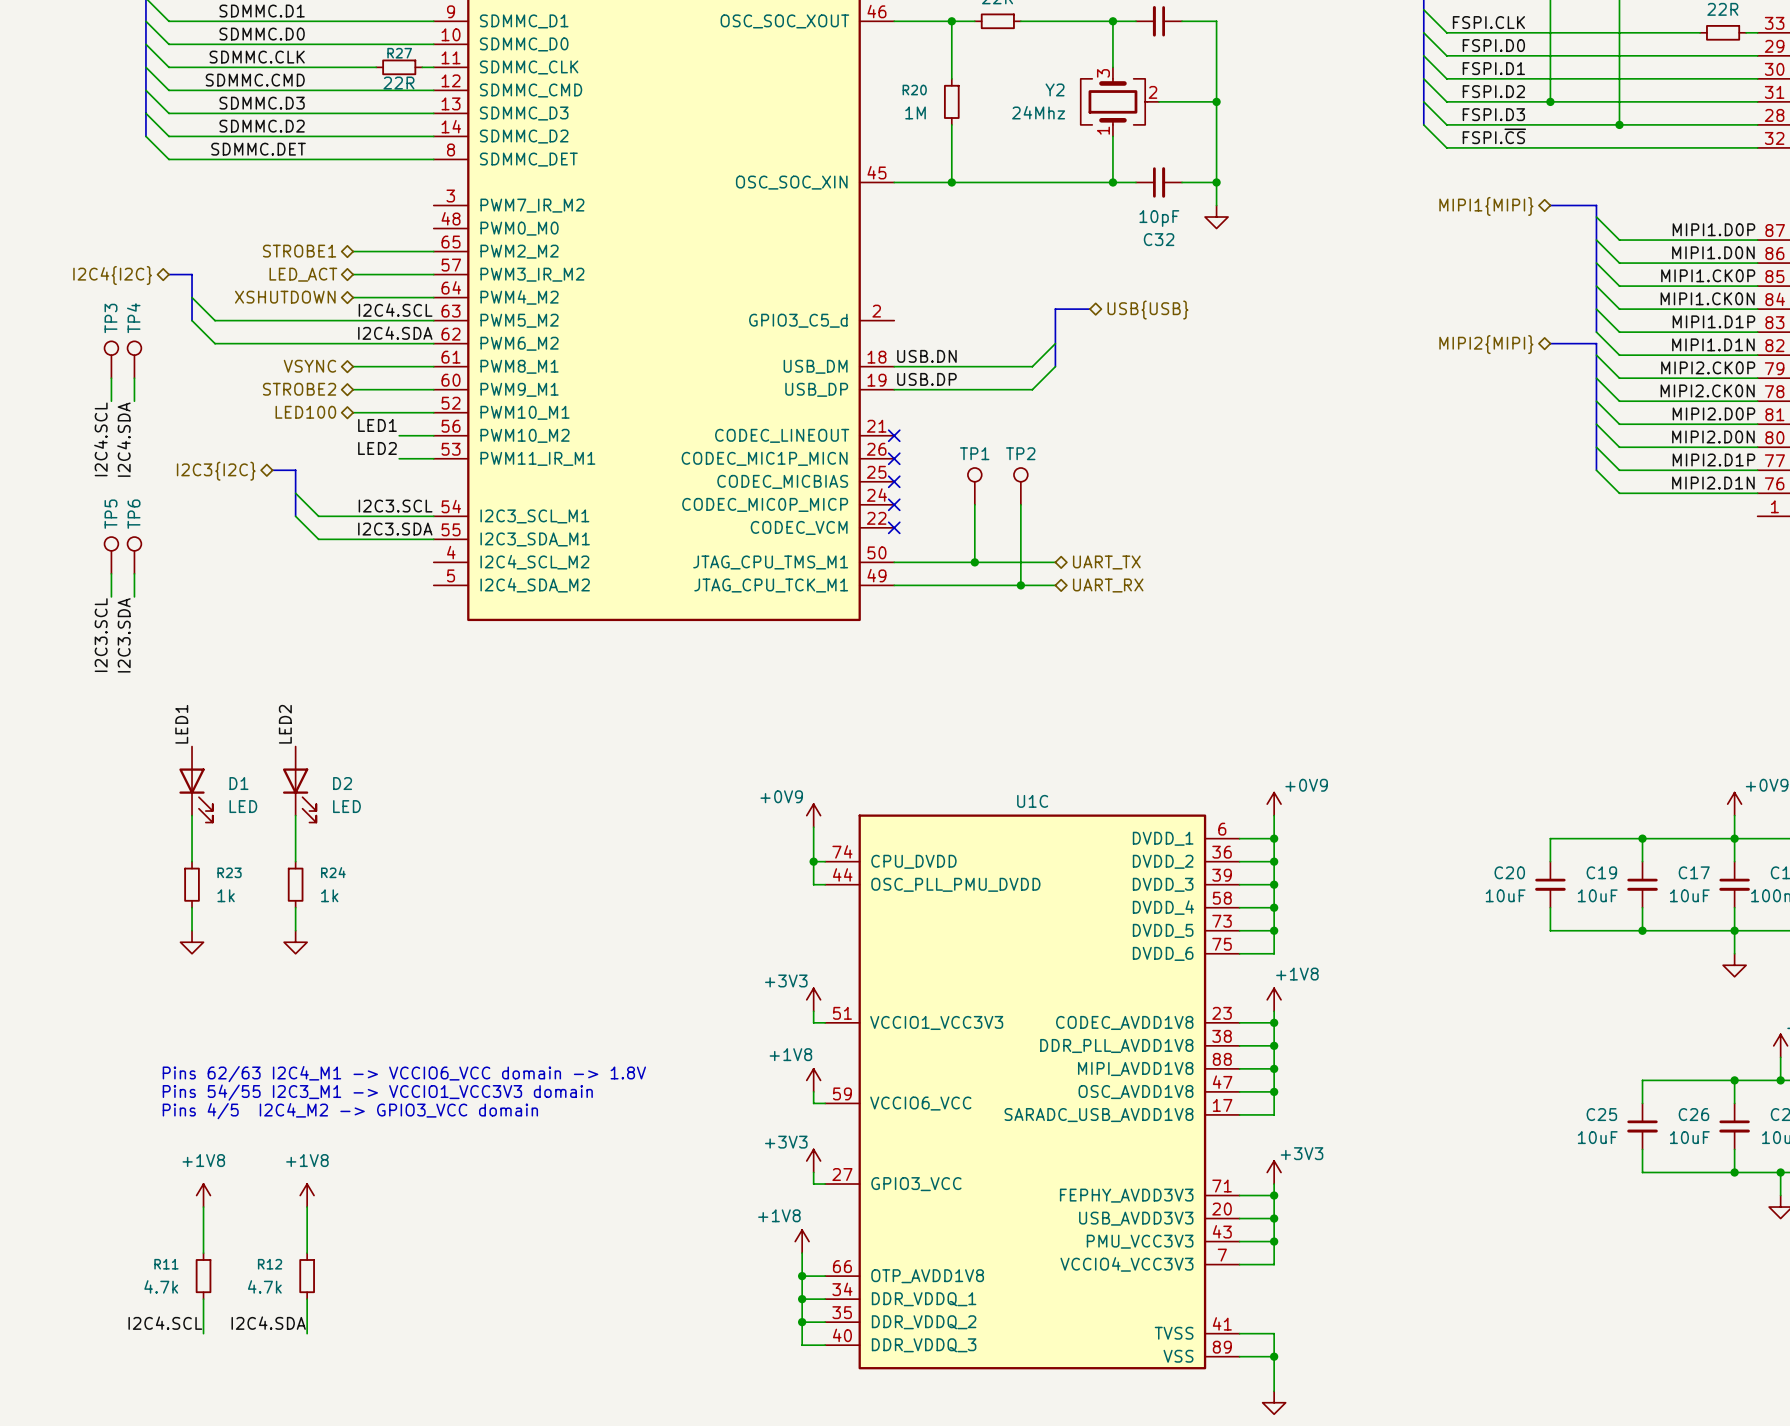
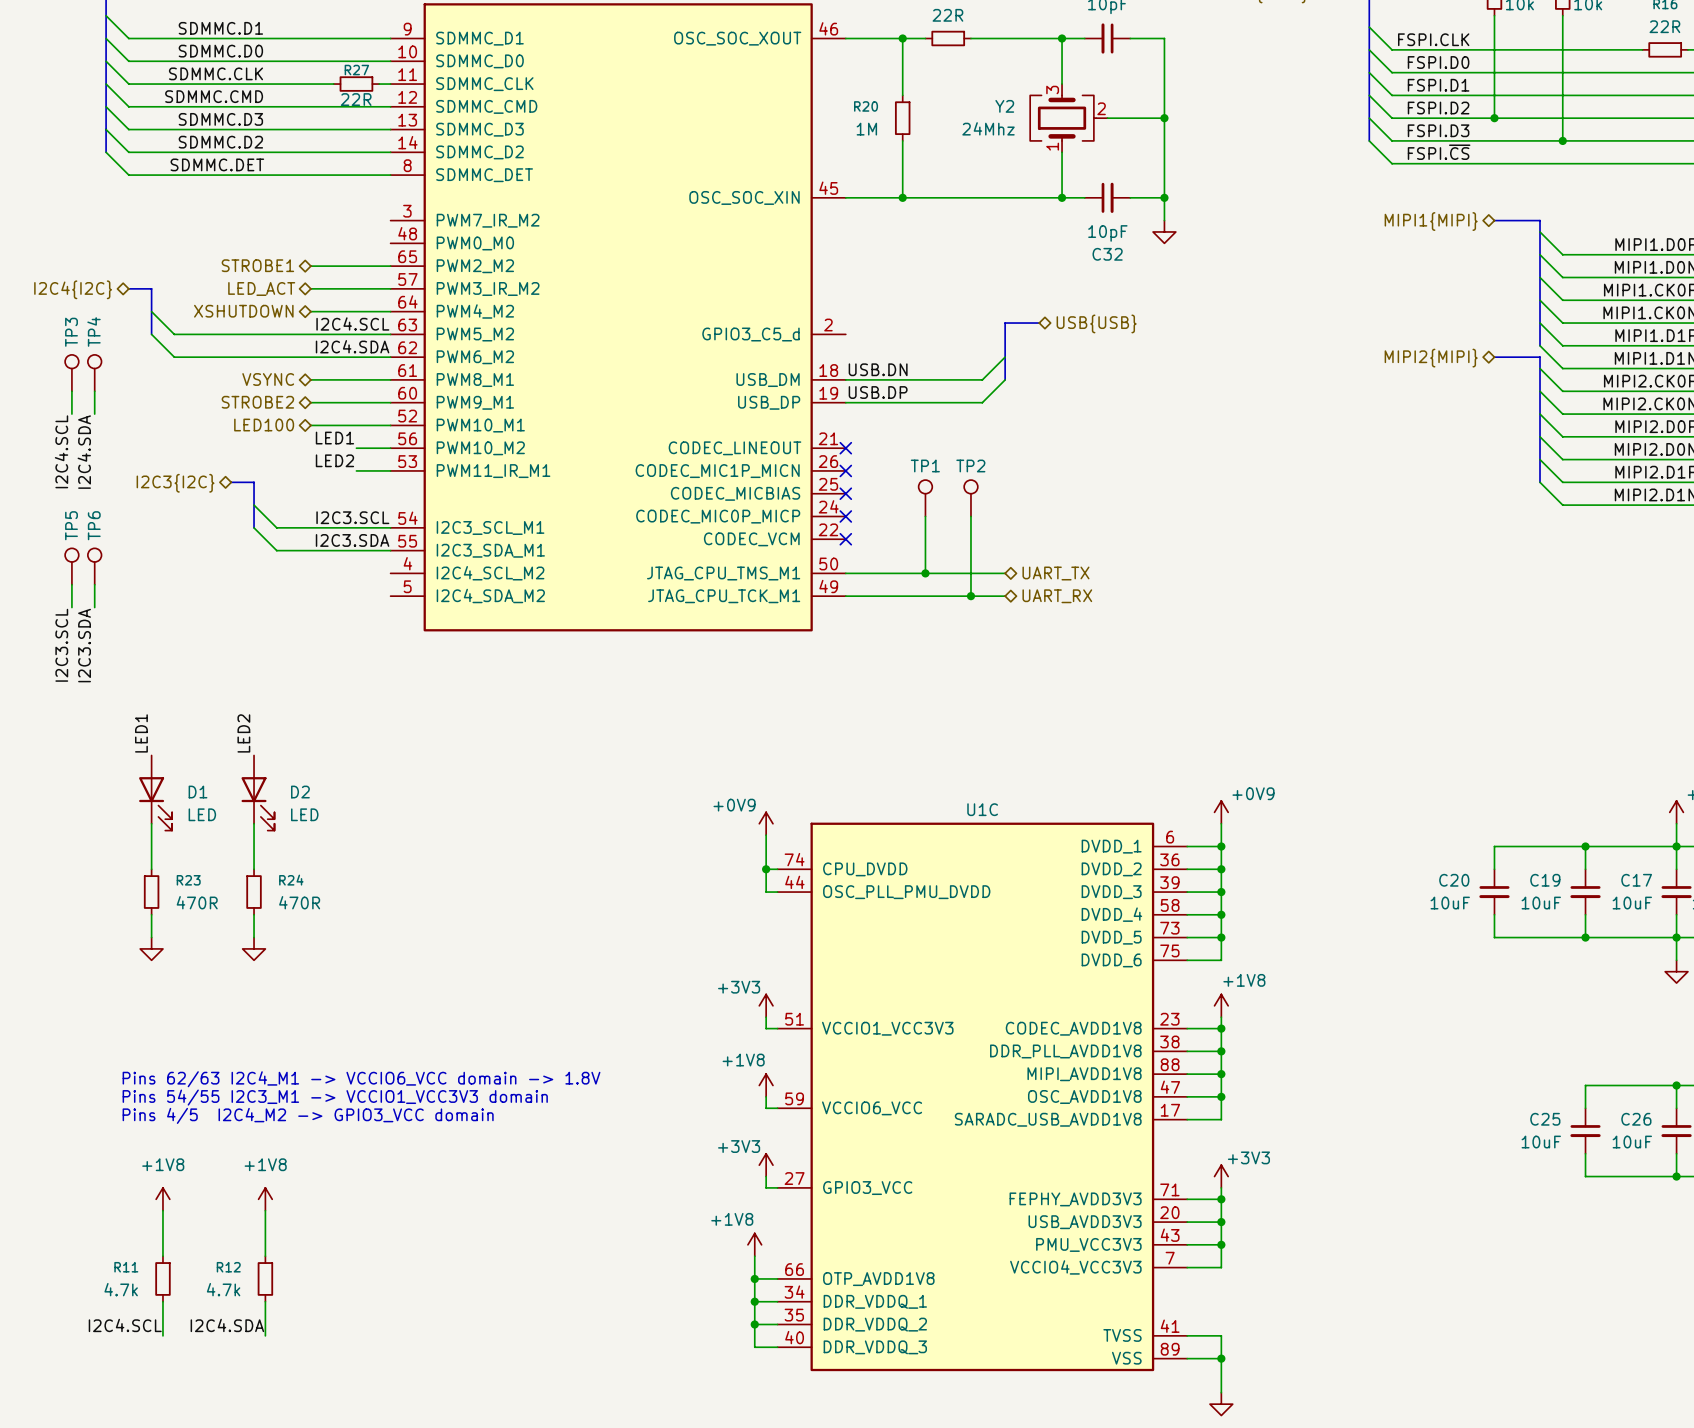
R23 value: 1k (226, 895) -> 470R (197, 902)
R24 value: 1k (329, 895) -> 470R (299, 902)

